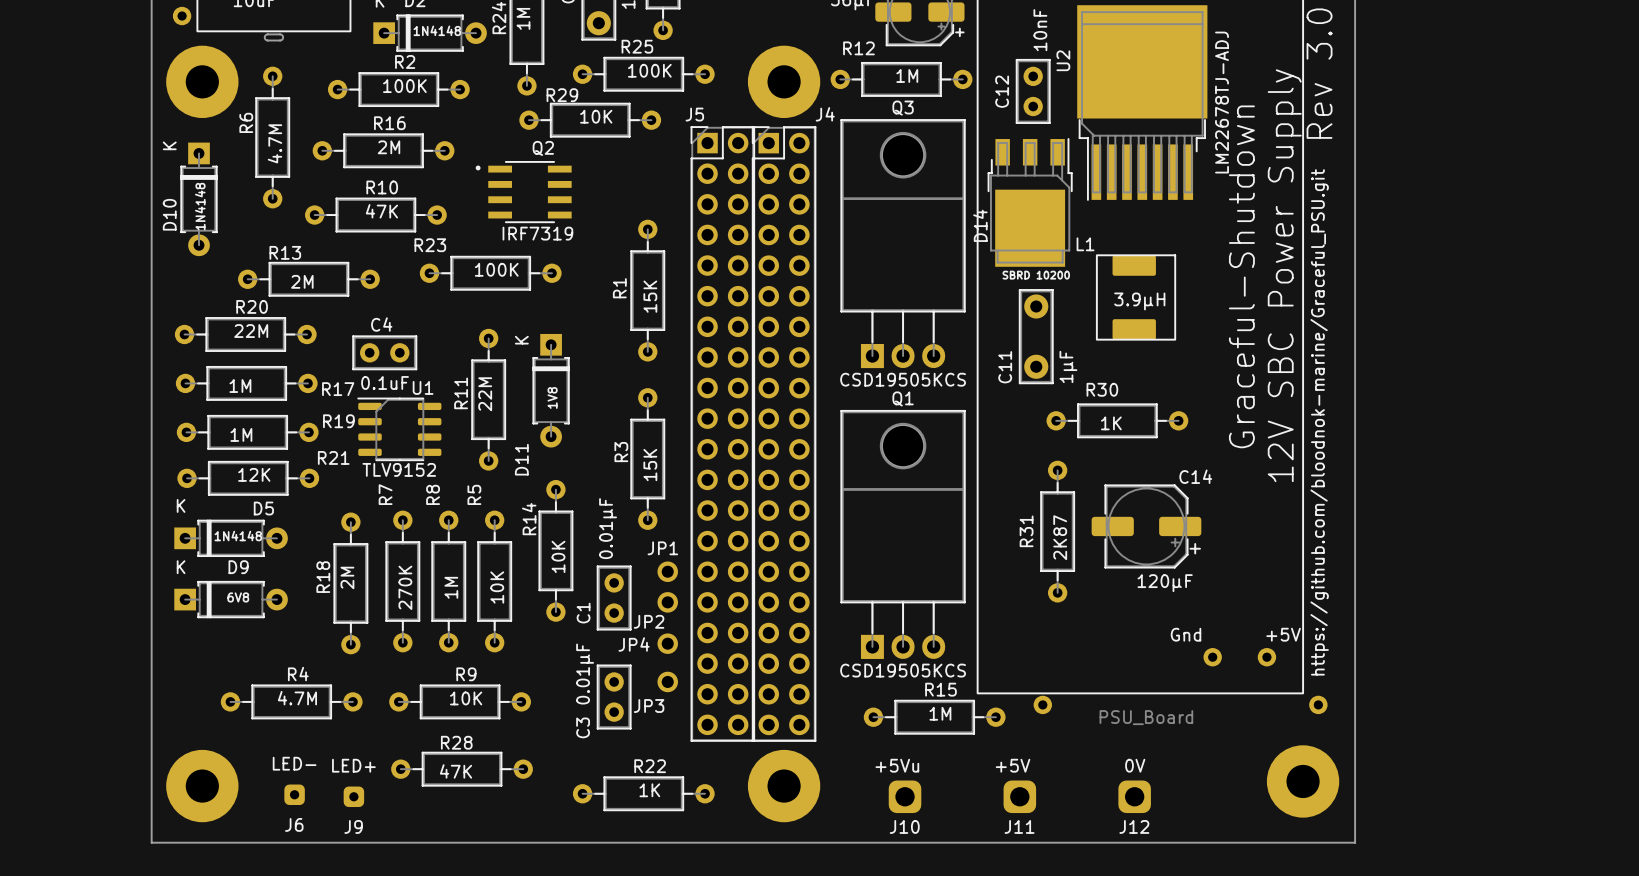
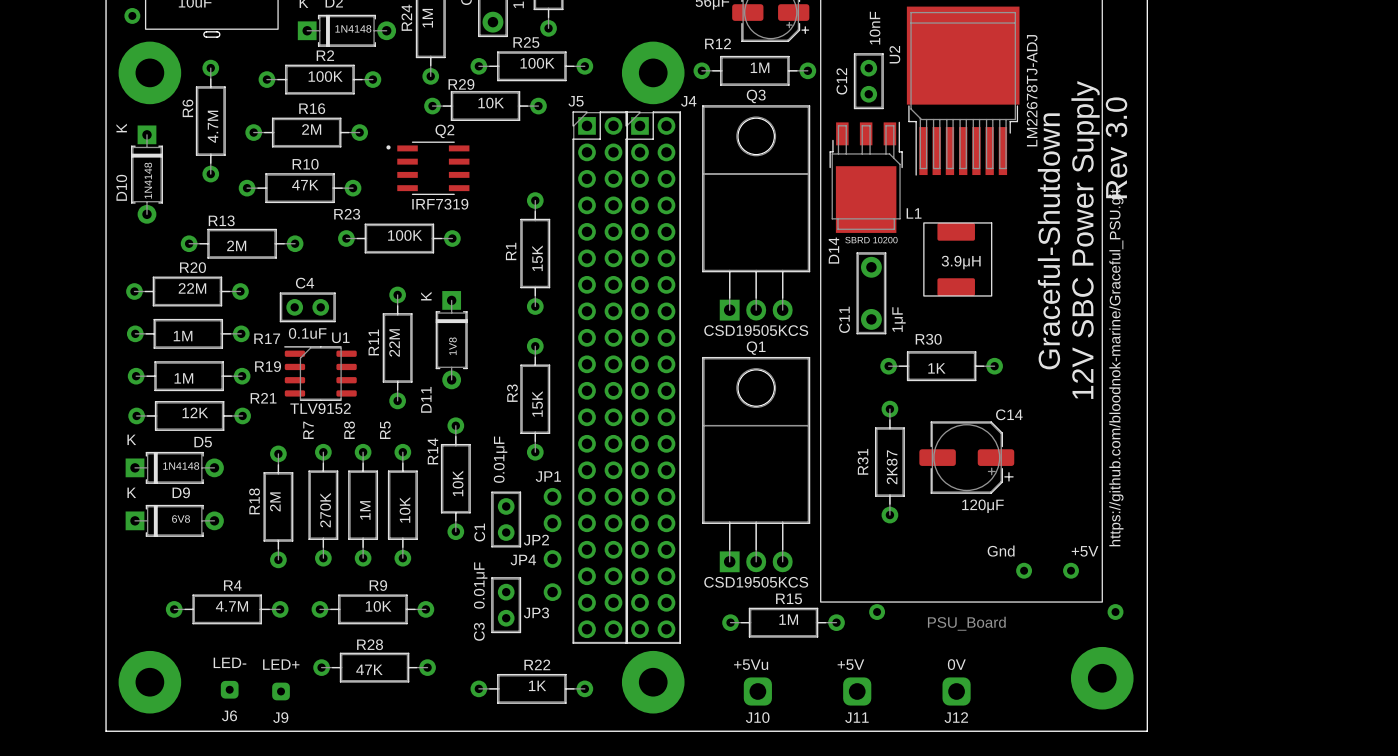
D14 name position: D14 (980, 225) -> D14 (833, 250)

